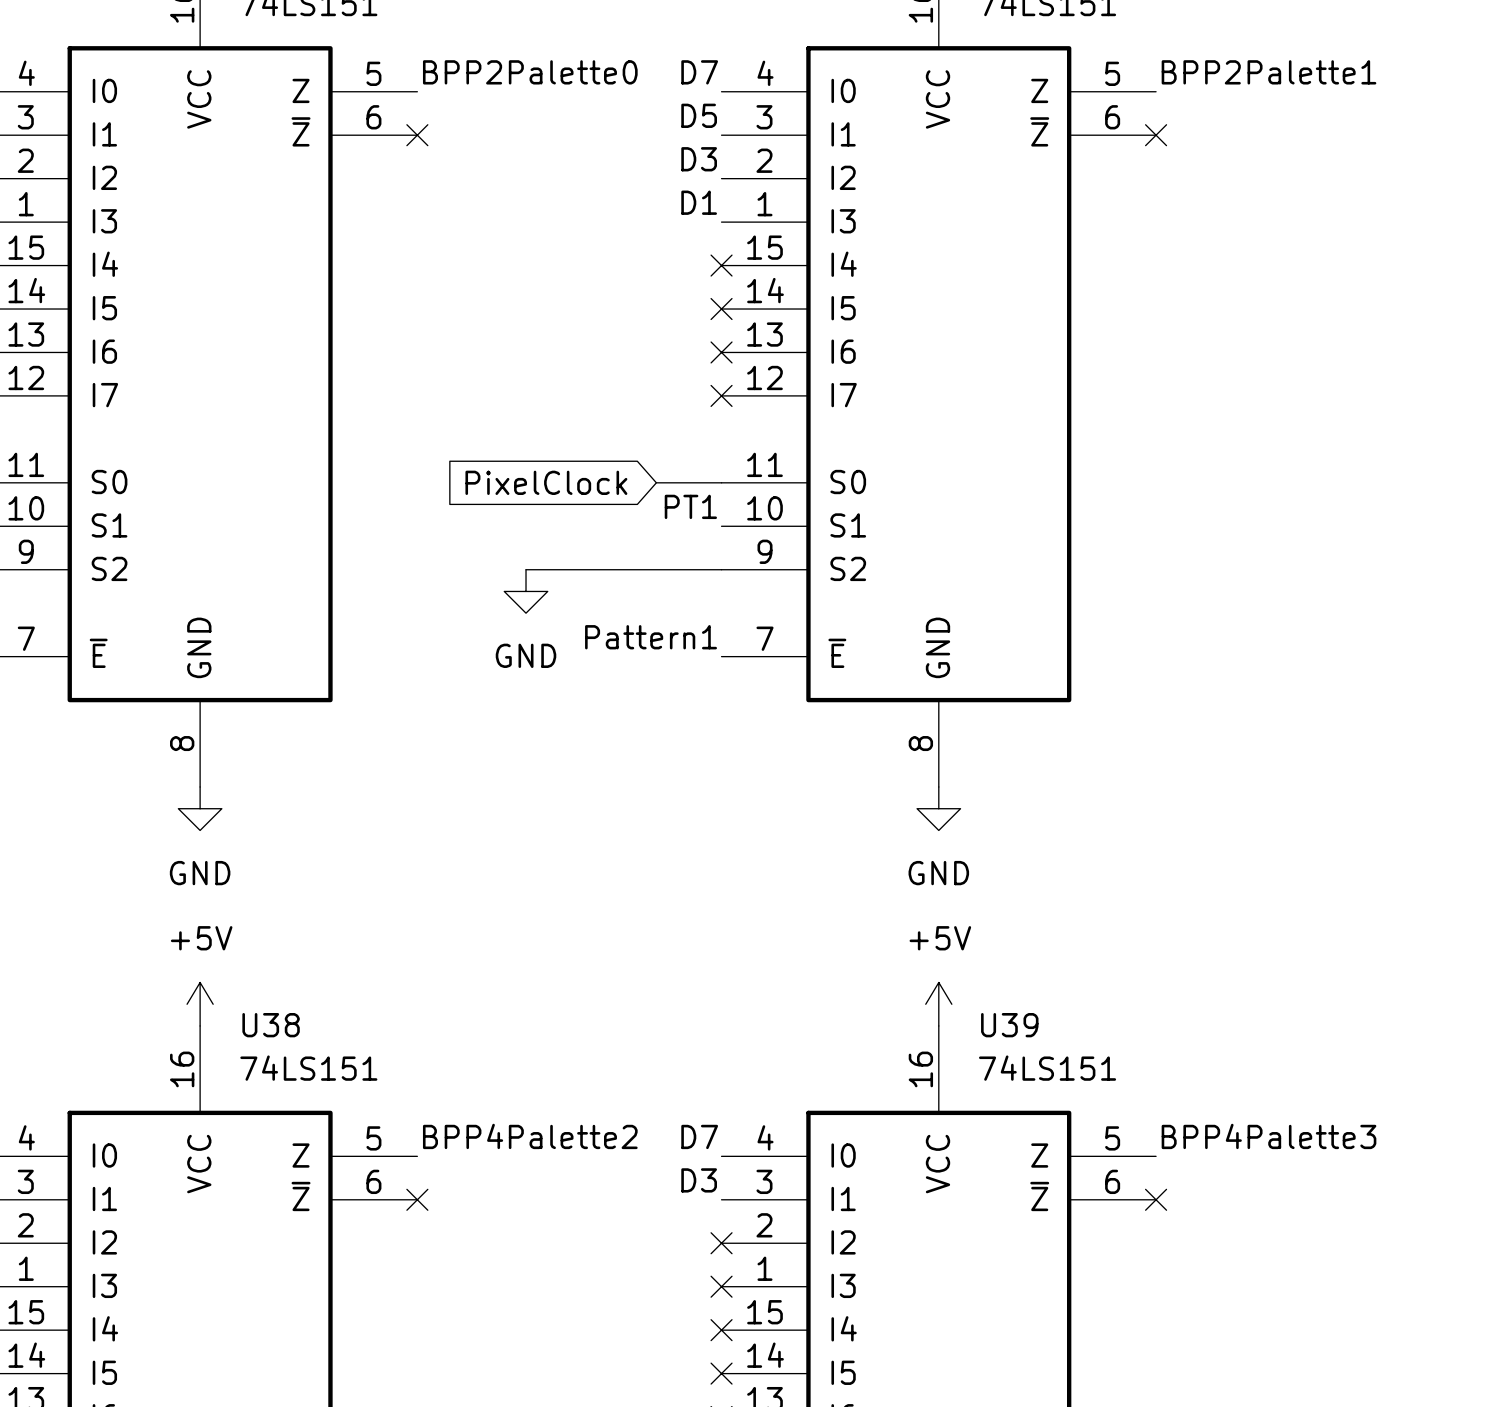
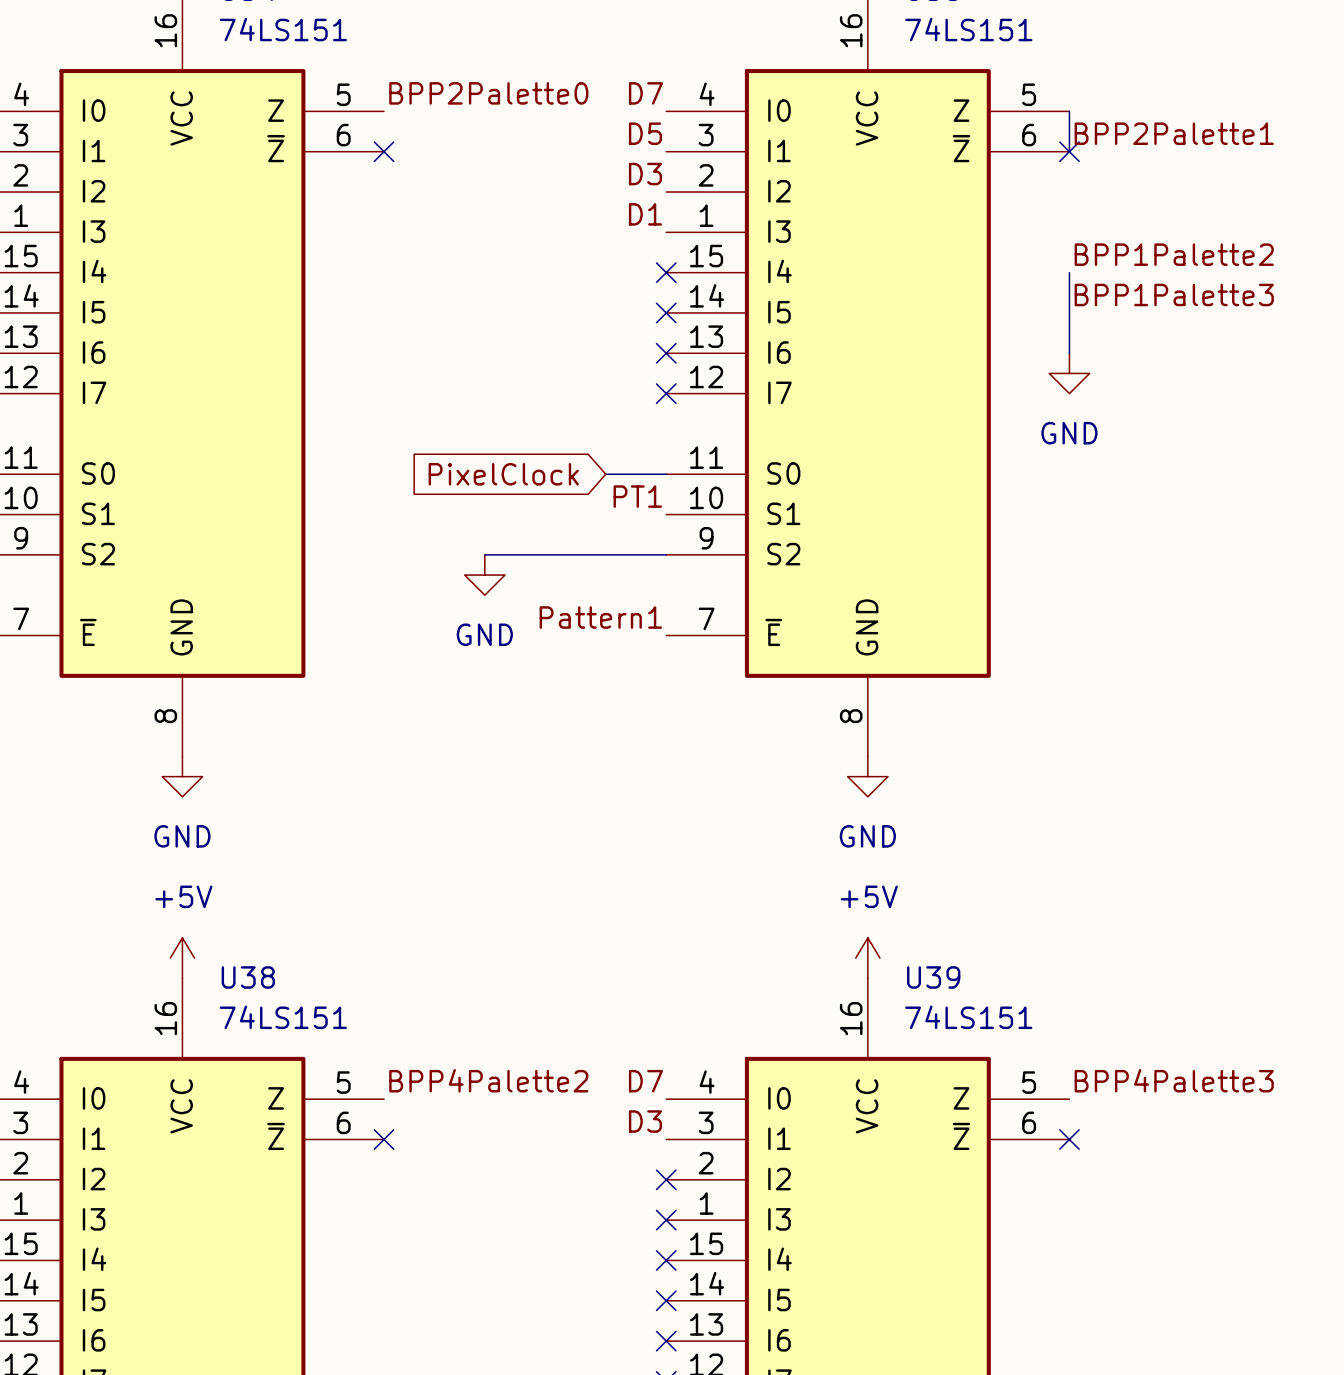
label position: BPP2Palette1 (1269, 72) -> BPP2Palette1 (1174, 133)
wire: none -> (1069, 111) (1069, 151)
label: none -> BPP1Palette2 (1174, 254)
wire: none -> (1069, 272) (1069, 353)
label: none -> BPP1Palette3 (1174, 294)
power symbol: none -> GND (1069, 373)

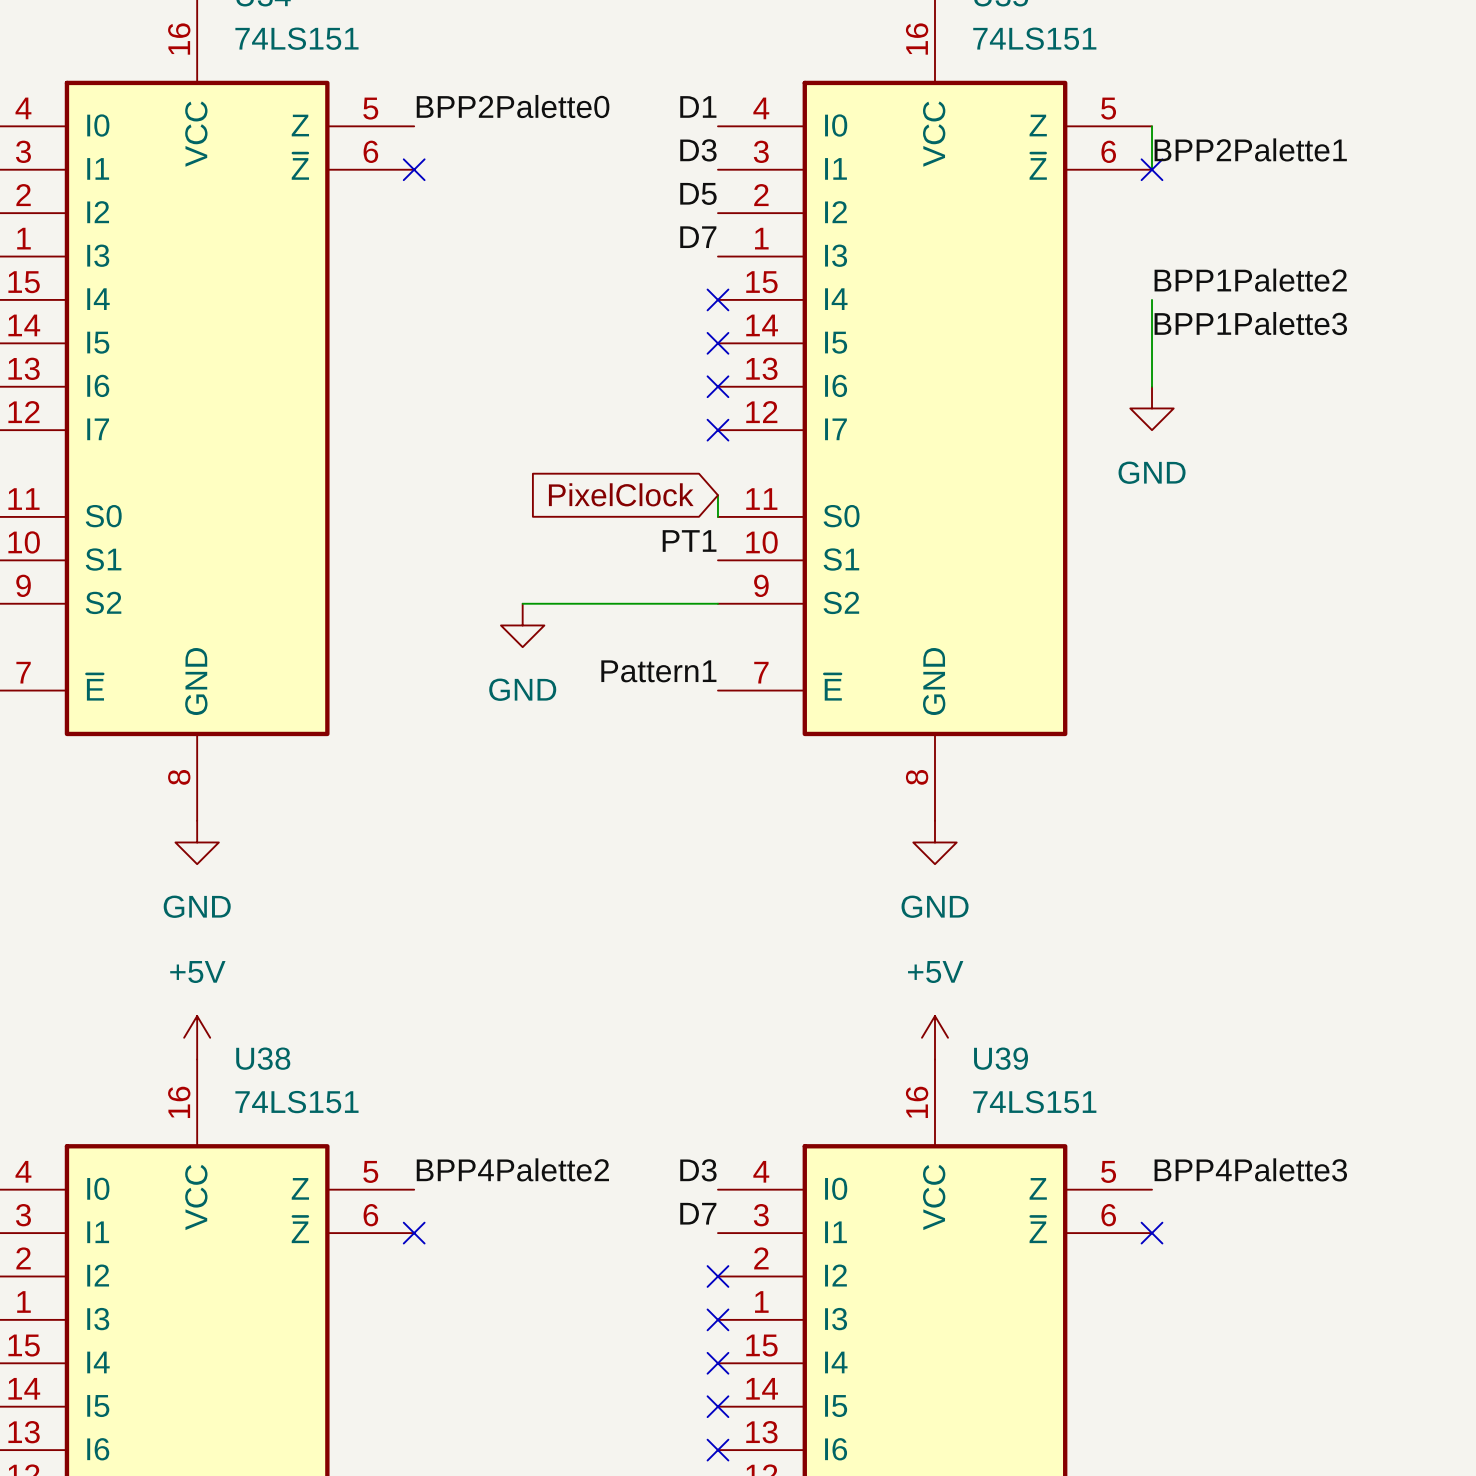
label: D7 (645, 93) -> D1 (698, 106)
label: D5 (645, 133) -> D3 (698, 150)
label: D3 (645, 174) -> D5 (698, 193)
label: D1 (645, 214) -> D7 (698, 237)
global label position: PixelClock (503, 474) -> PixelClock (621, 494)
wire: (605, 474) (666, 474) -> (717, 495) (717, 516)
label: D7 (645, 1081) -> D3 (698, 1170)
label: D3 (645, 1121) -> D7 (698, 1213)

